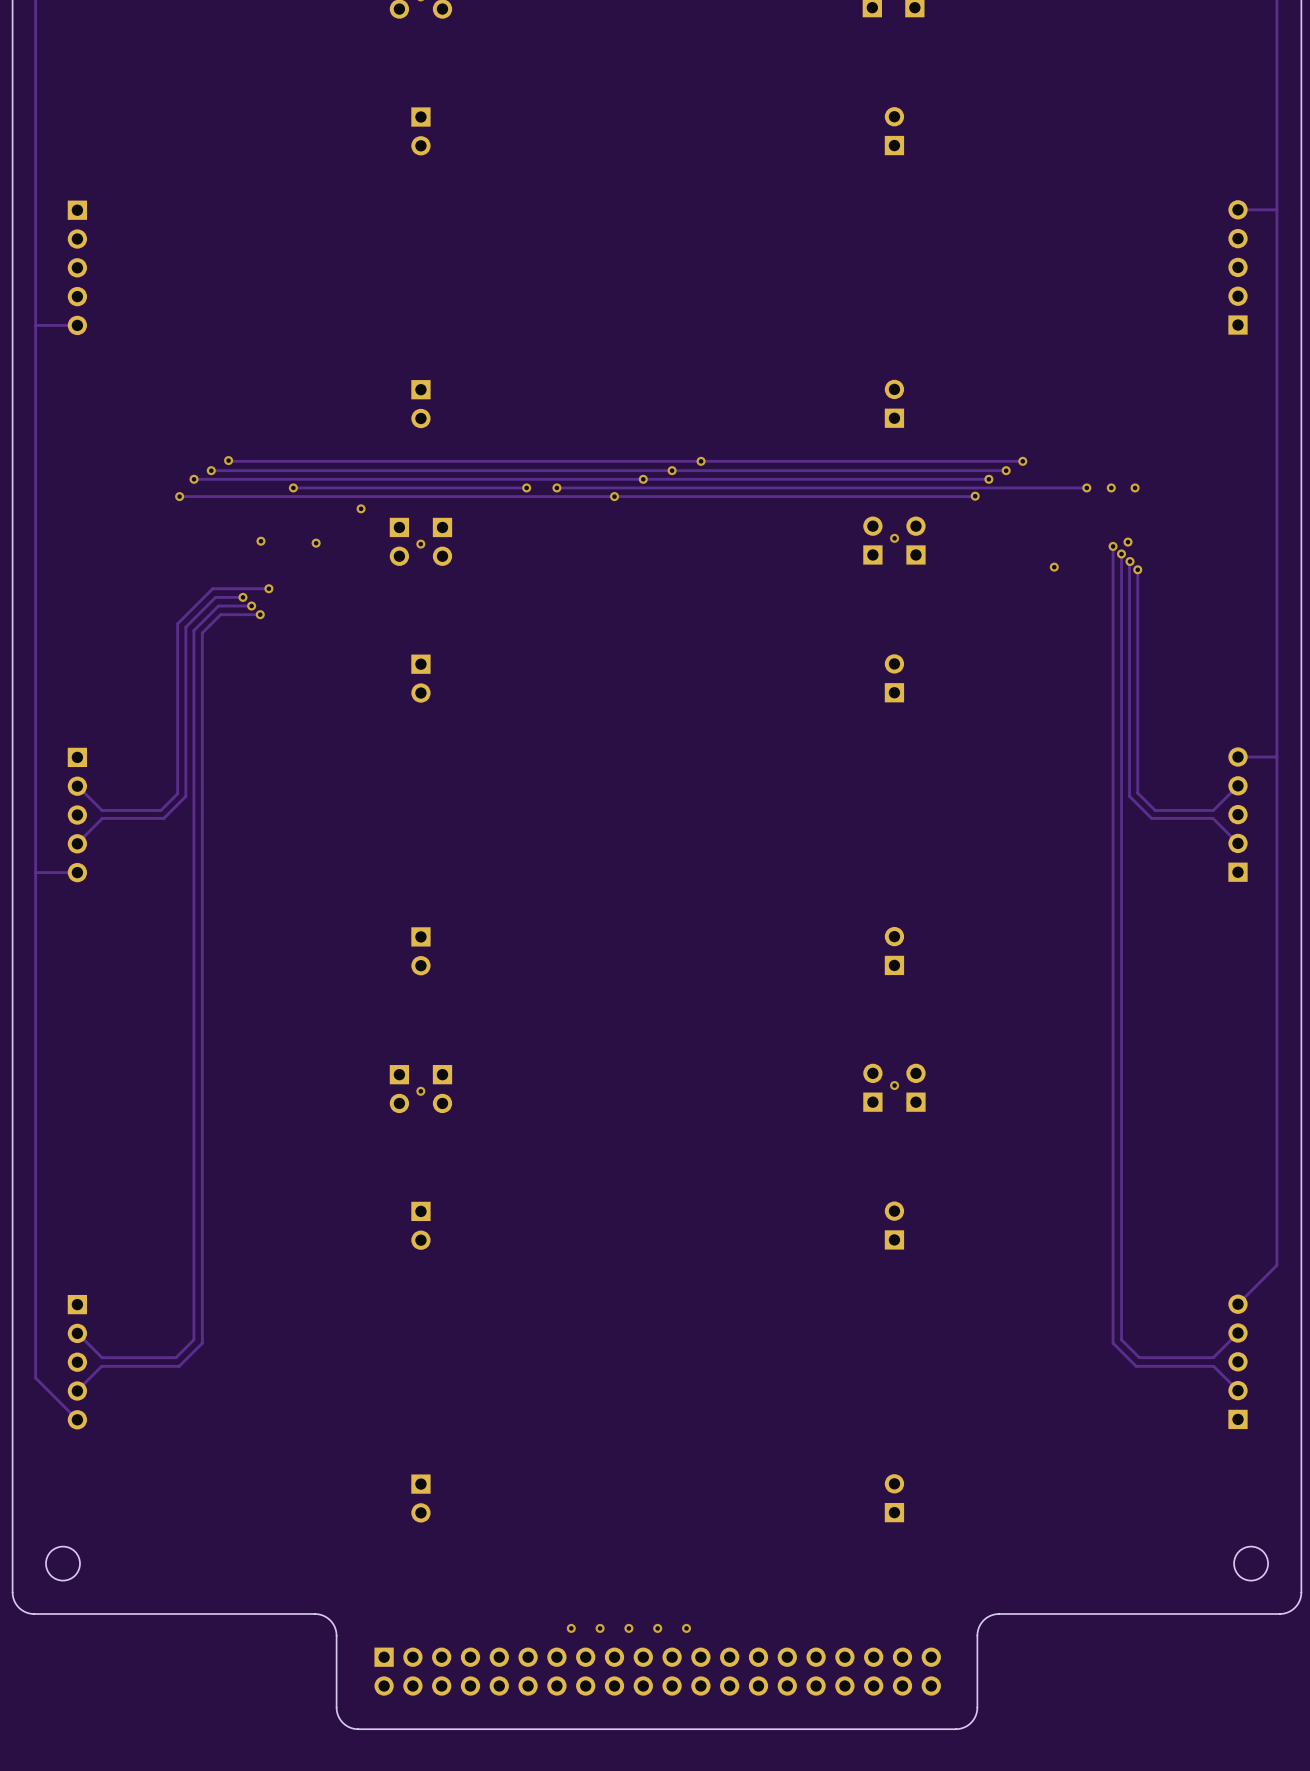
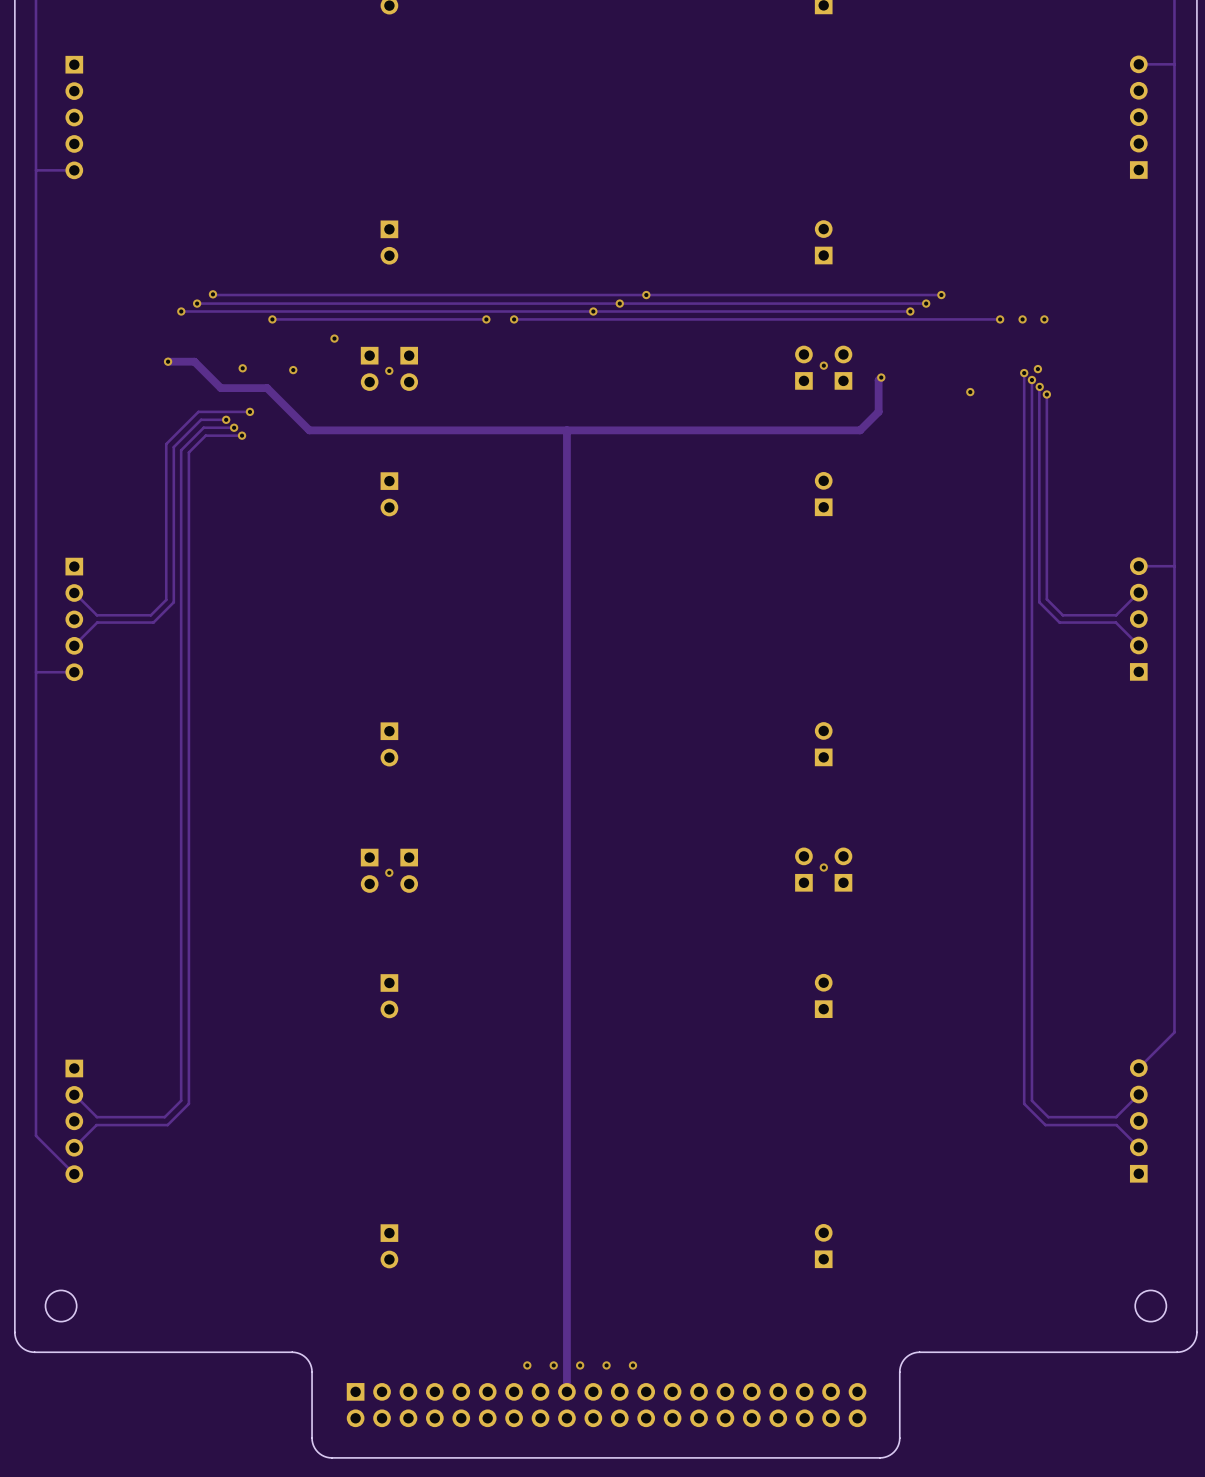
via position: (179, 496) -> (168, 361)
via: (614, 496) -> none
track: (975, 496) (180, 496) -> none
via position: (975, 496) -> (881, 377)
track: none -> (168, 361) (194, 361) (220, 388) (267, 388) (309, 430) (860, 430) (878, 411) (878, 380) (881, 377)
track: none -> (566, 430) (566, 1391)

